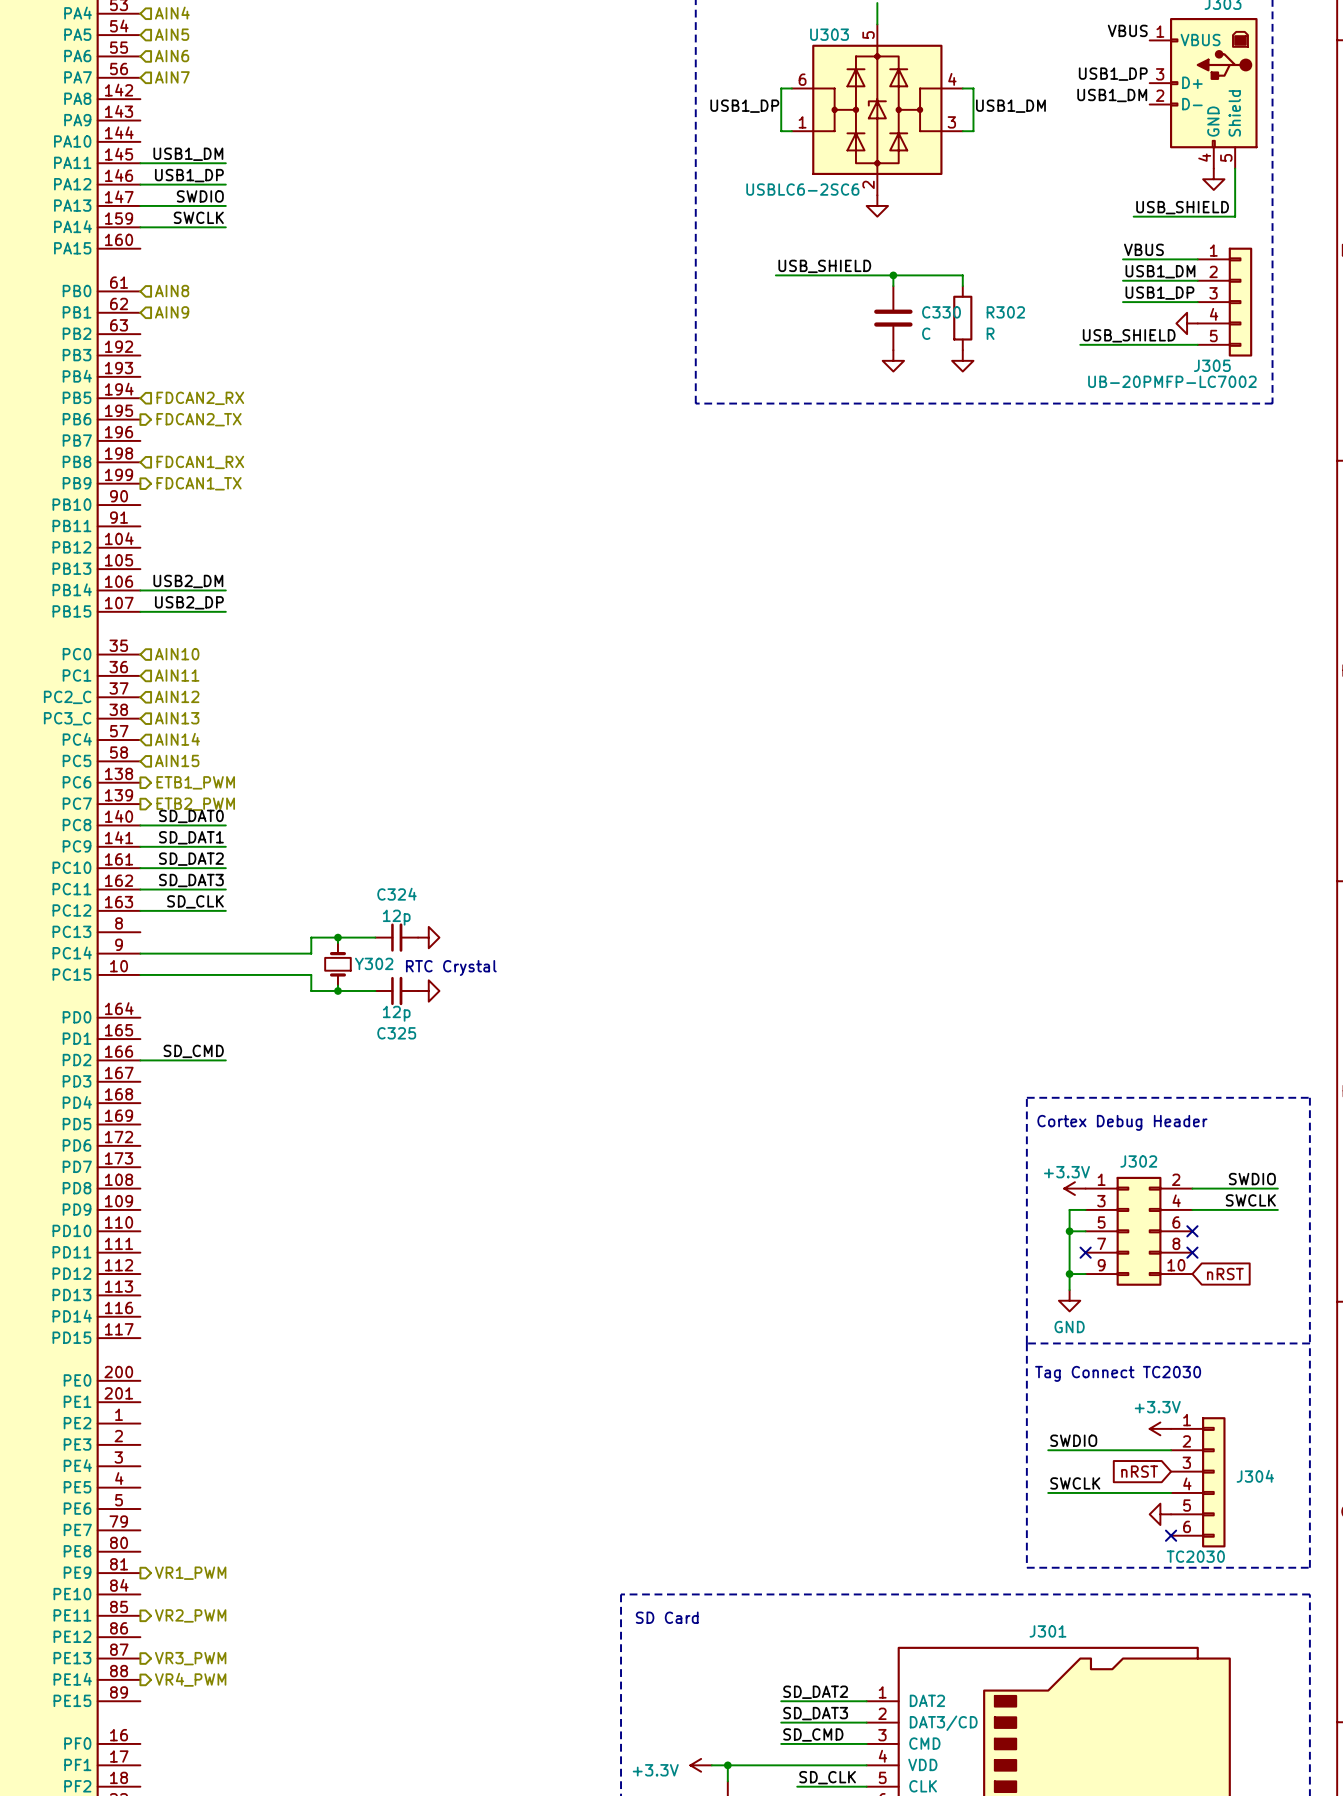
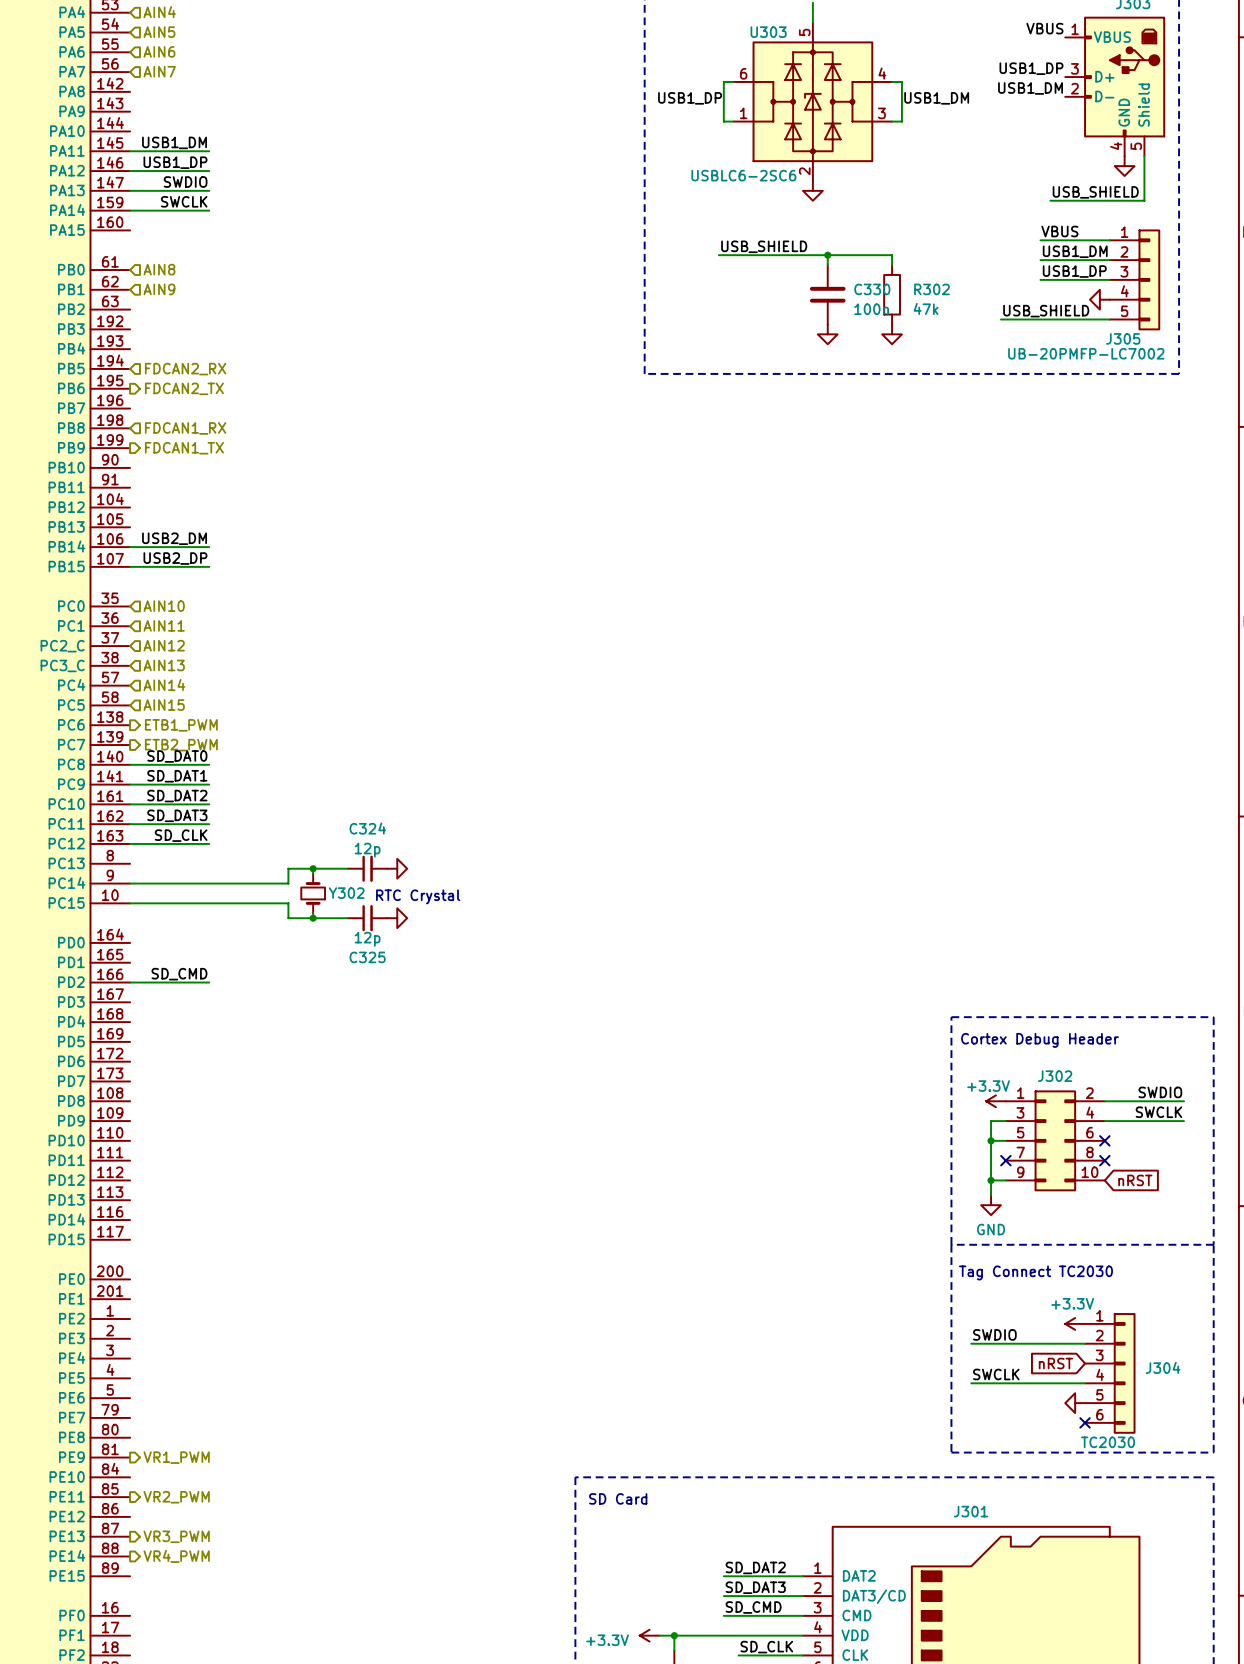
C330 value: C (926, 333) -> 100n (871, 309)
R302 value: R (990, 333) -> 47k (926, 308)

